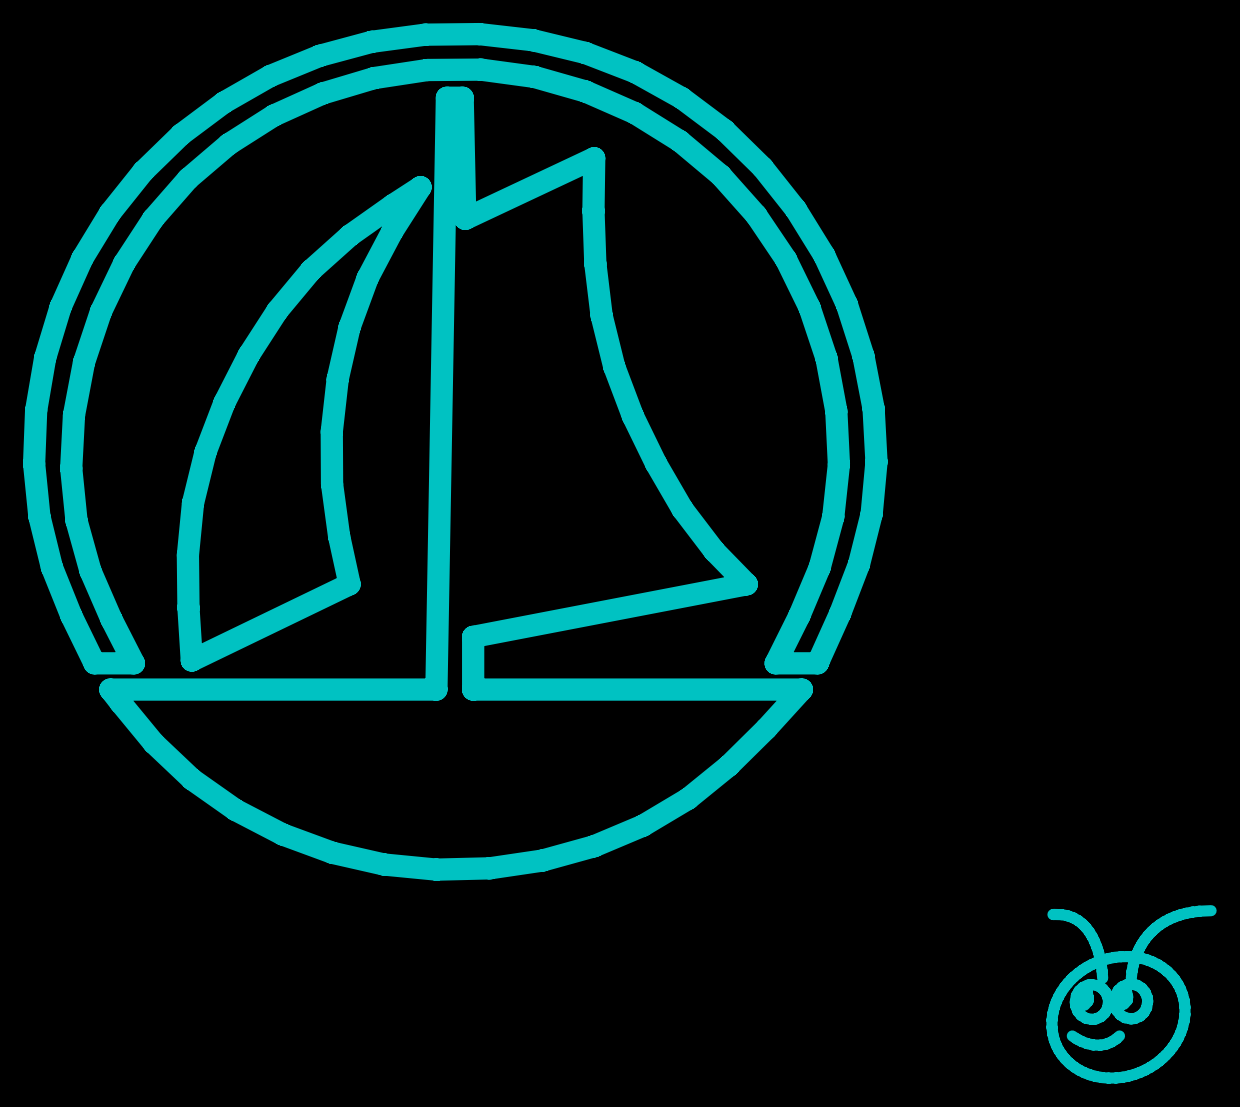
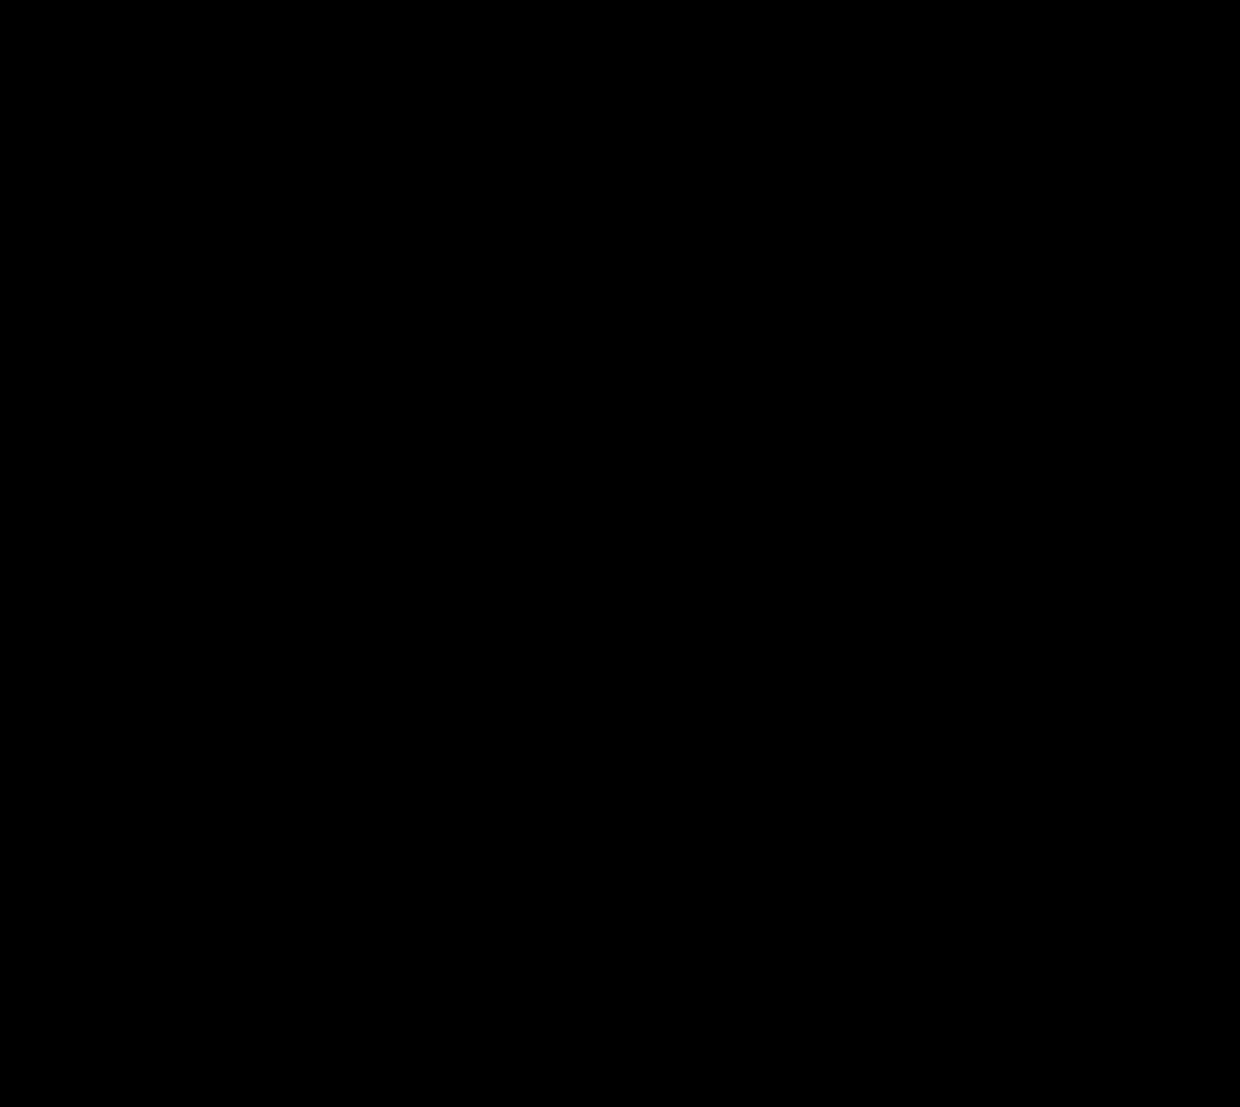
drawing: [22, 22, 888, 881] -> none
drawing: [1046, 905, 1217, 1084] -> none

